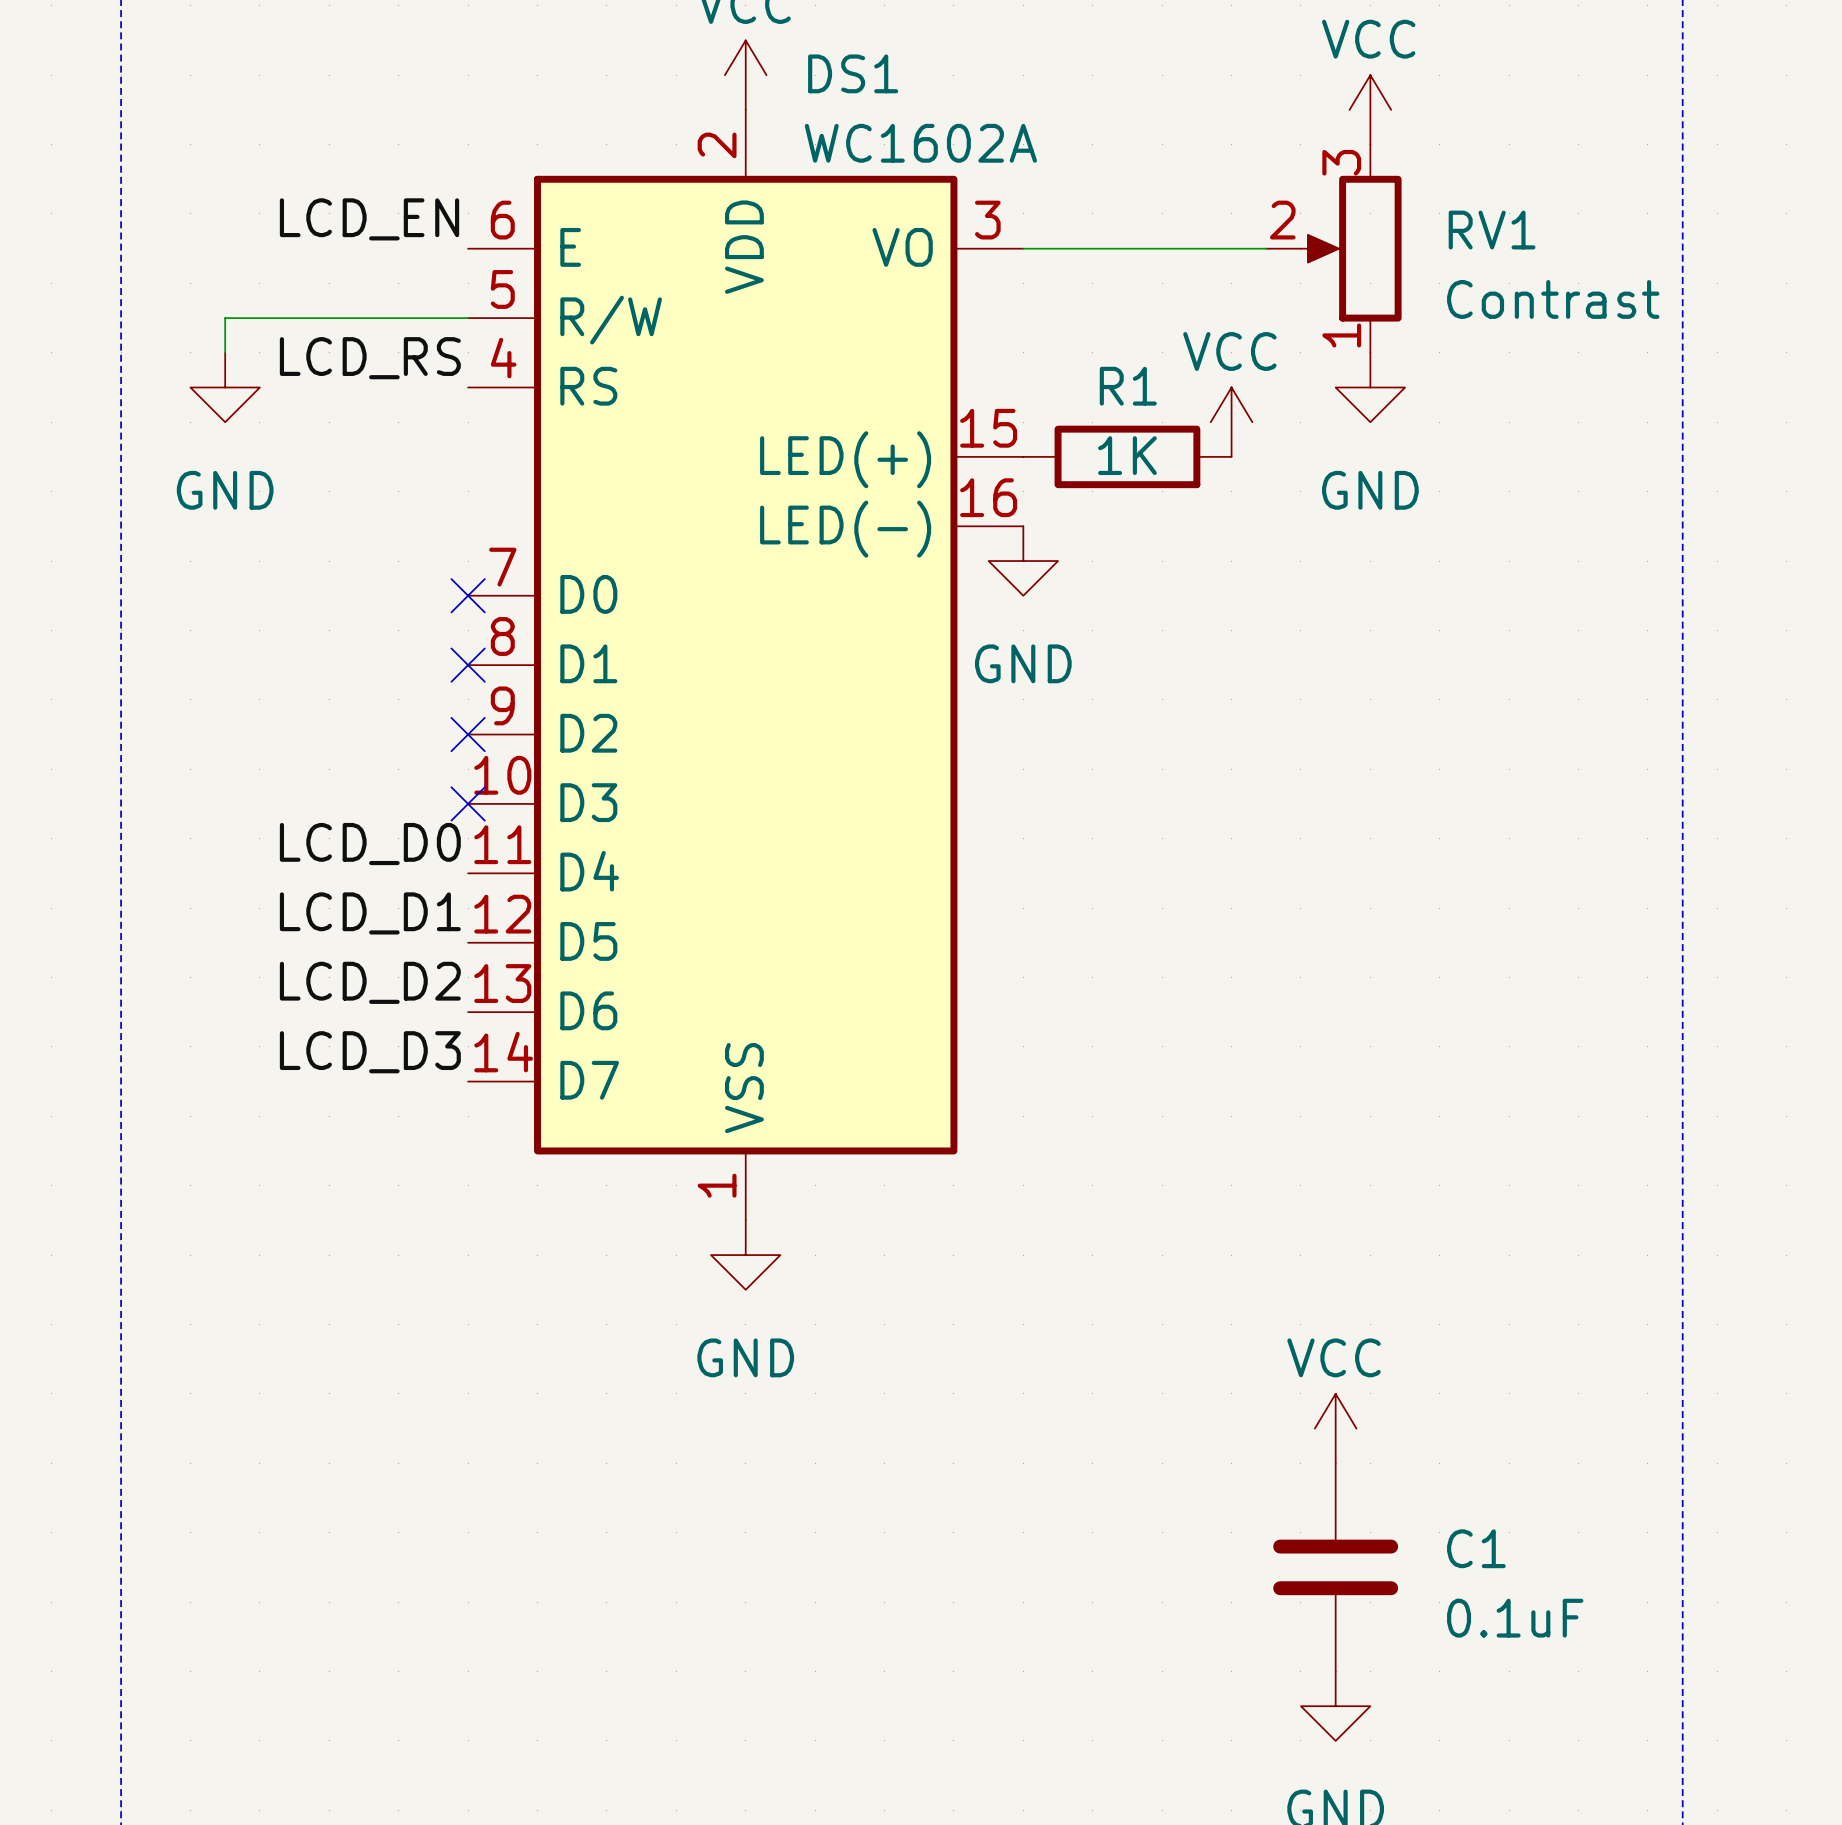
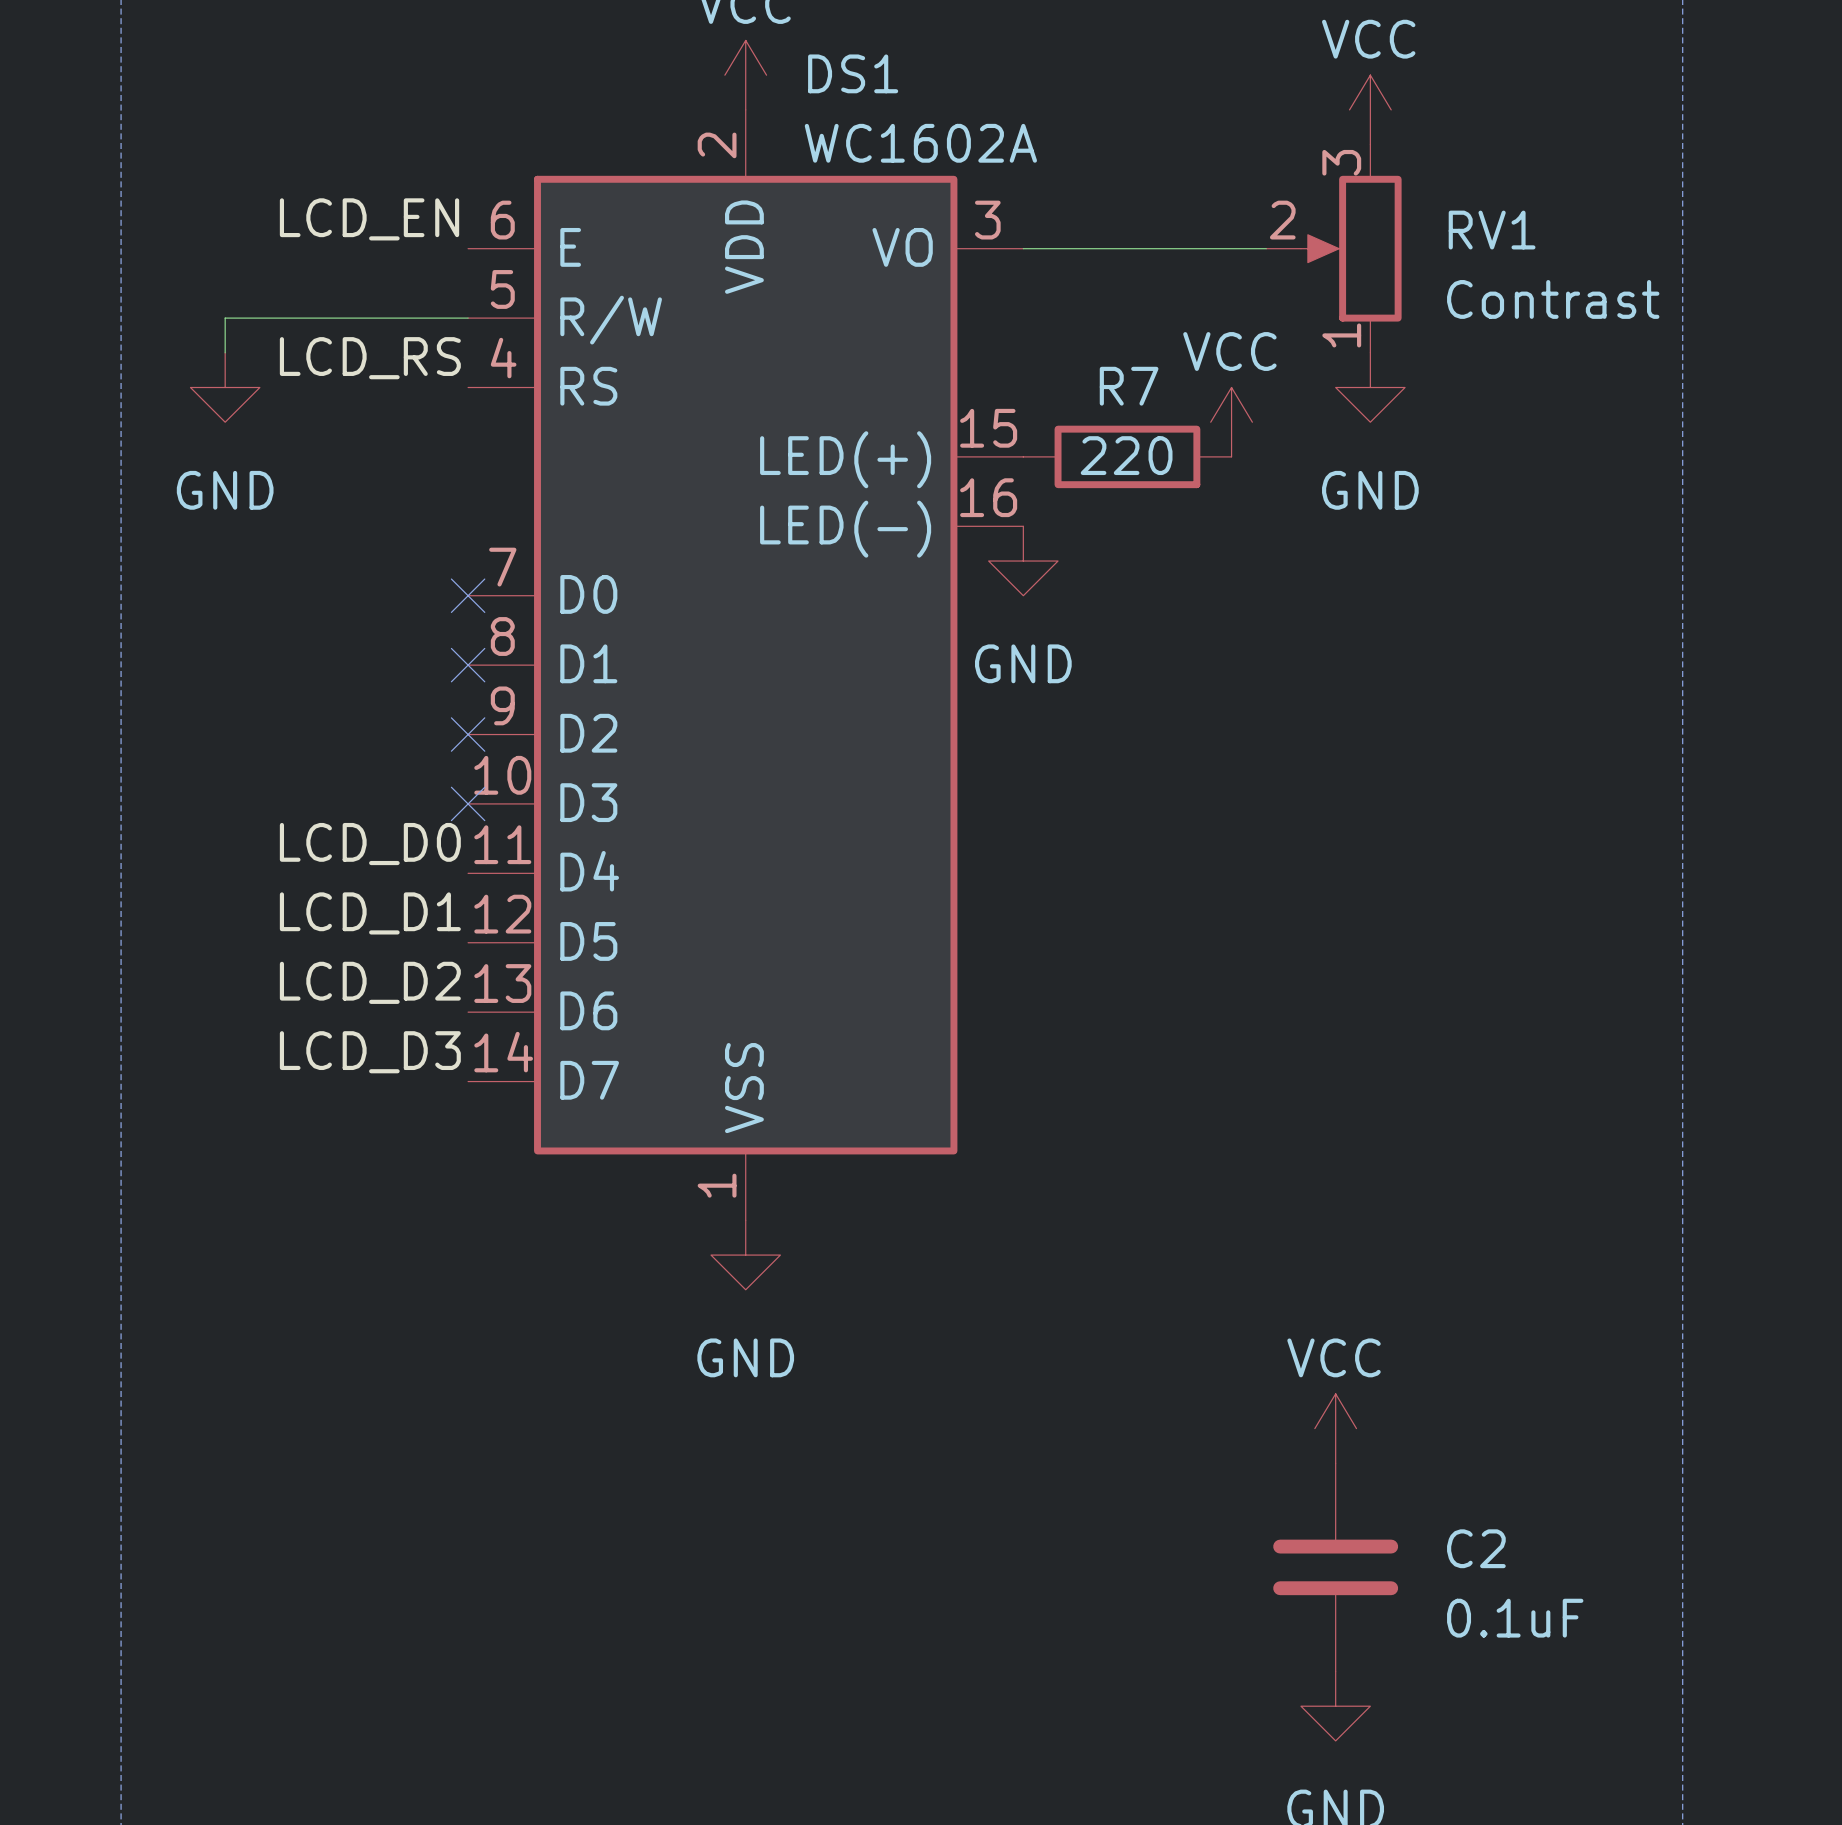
R1 name: R1 (1128, 386) -> R7 (1129, 386)
R1 value: 1K (1127, 455) -> 220 (1126, 455)
C1 name: C1 (1476, 1548) -> C2 (1476, 1548)

